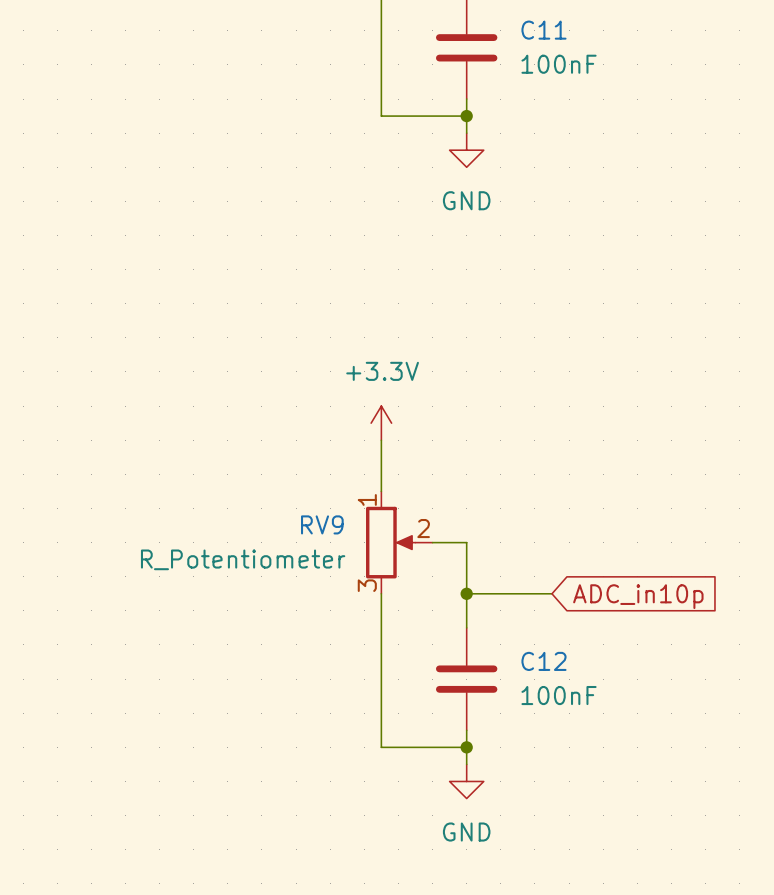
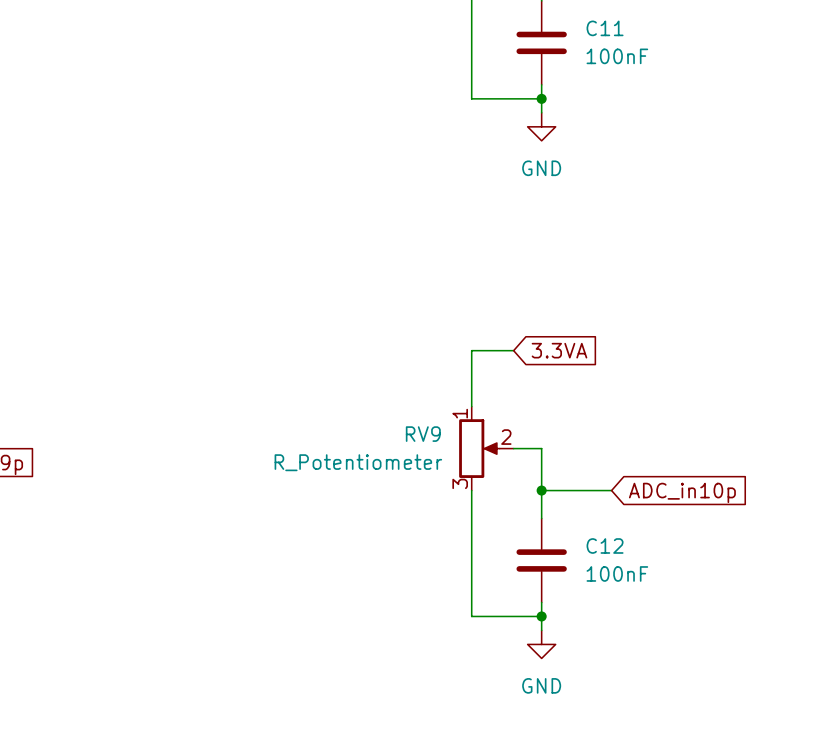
power symbol: +3.3V (381, 423) -> none
wire: none -> (513, 350) (471, 350) (471, 364)
global label: none -> 3.3VA (559, 350)

